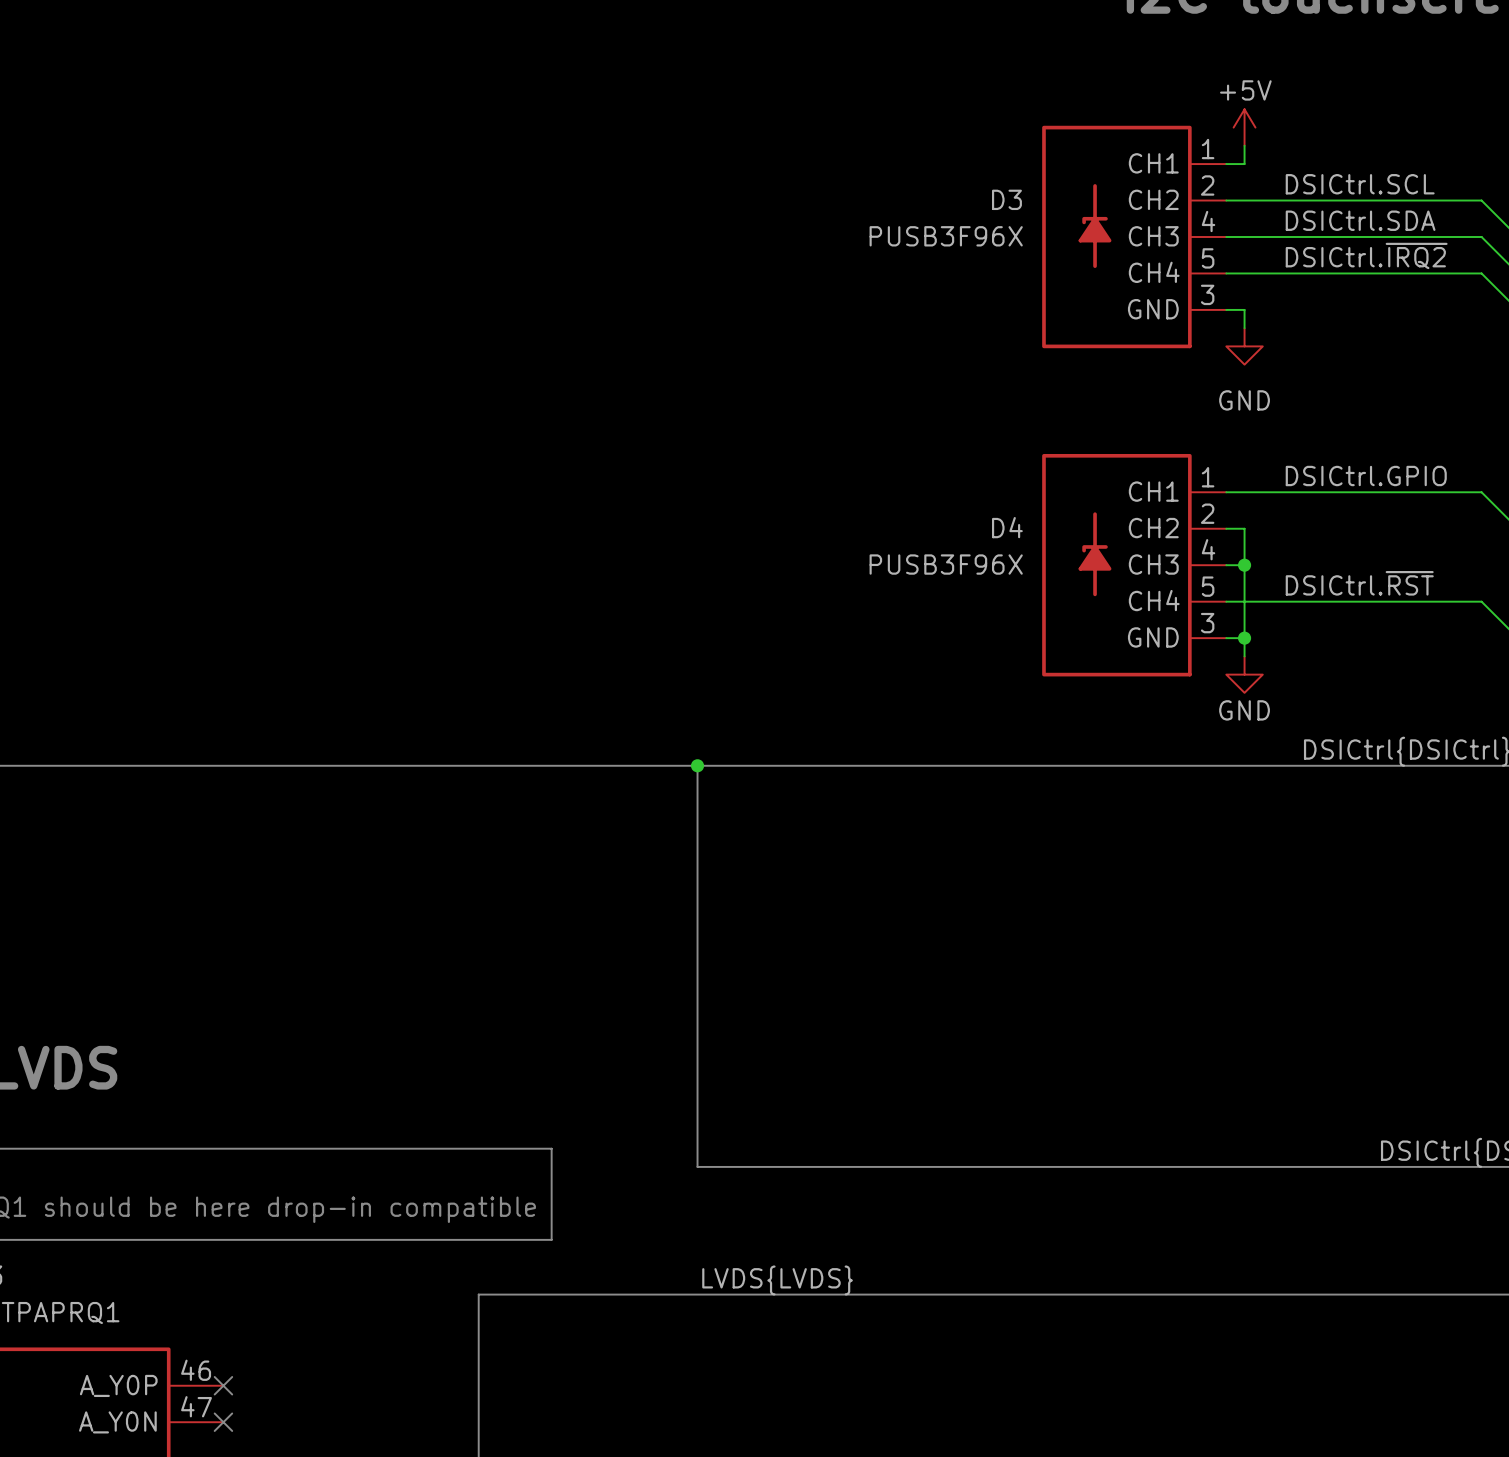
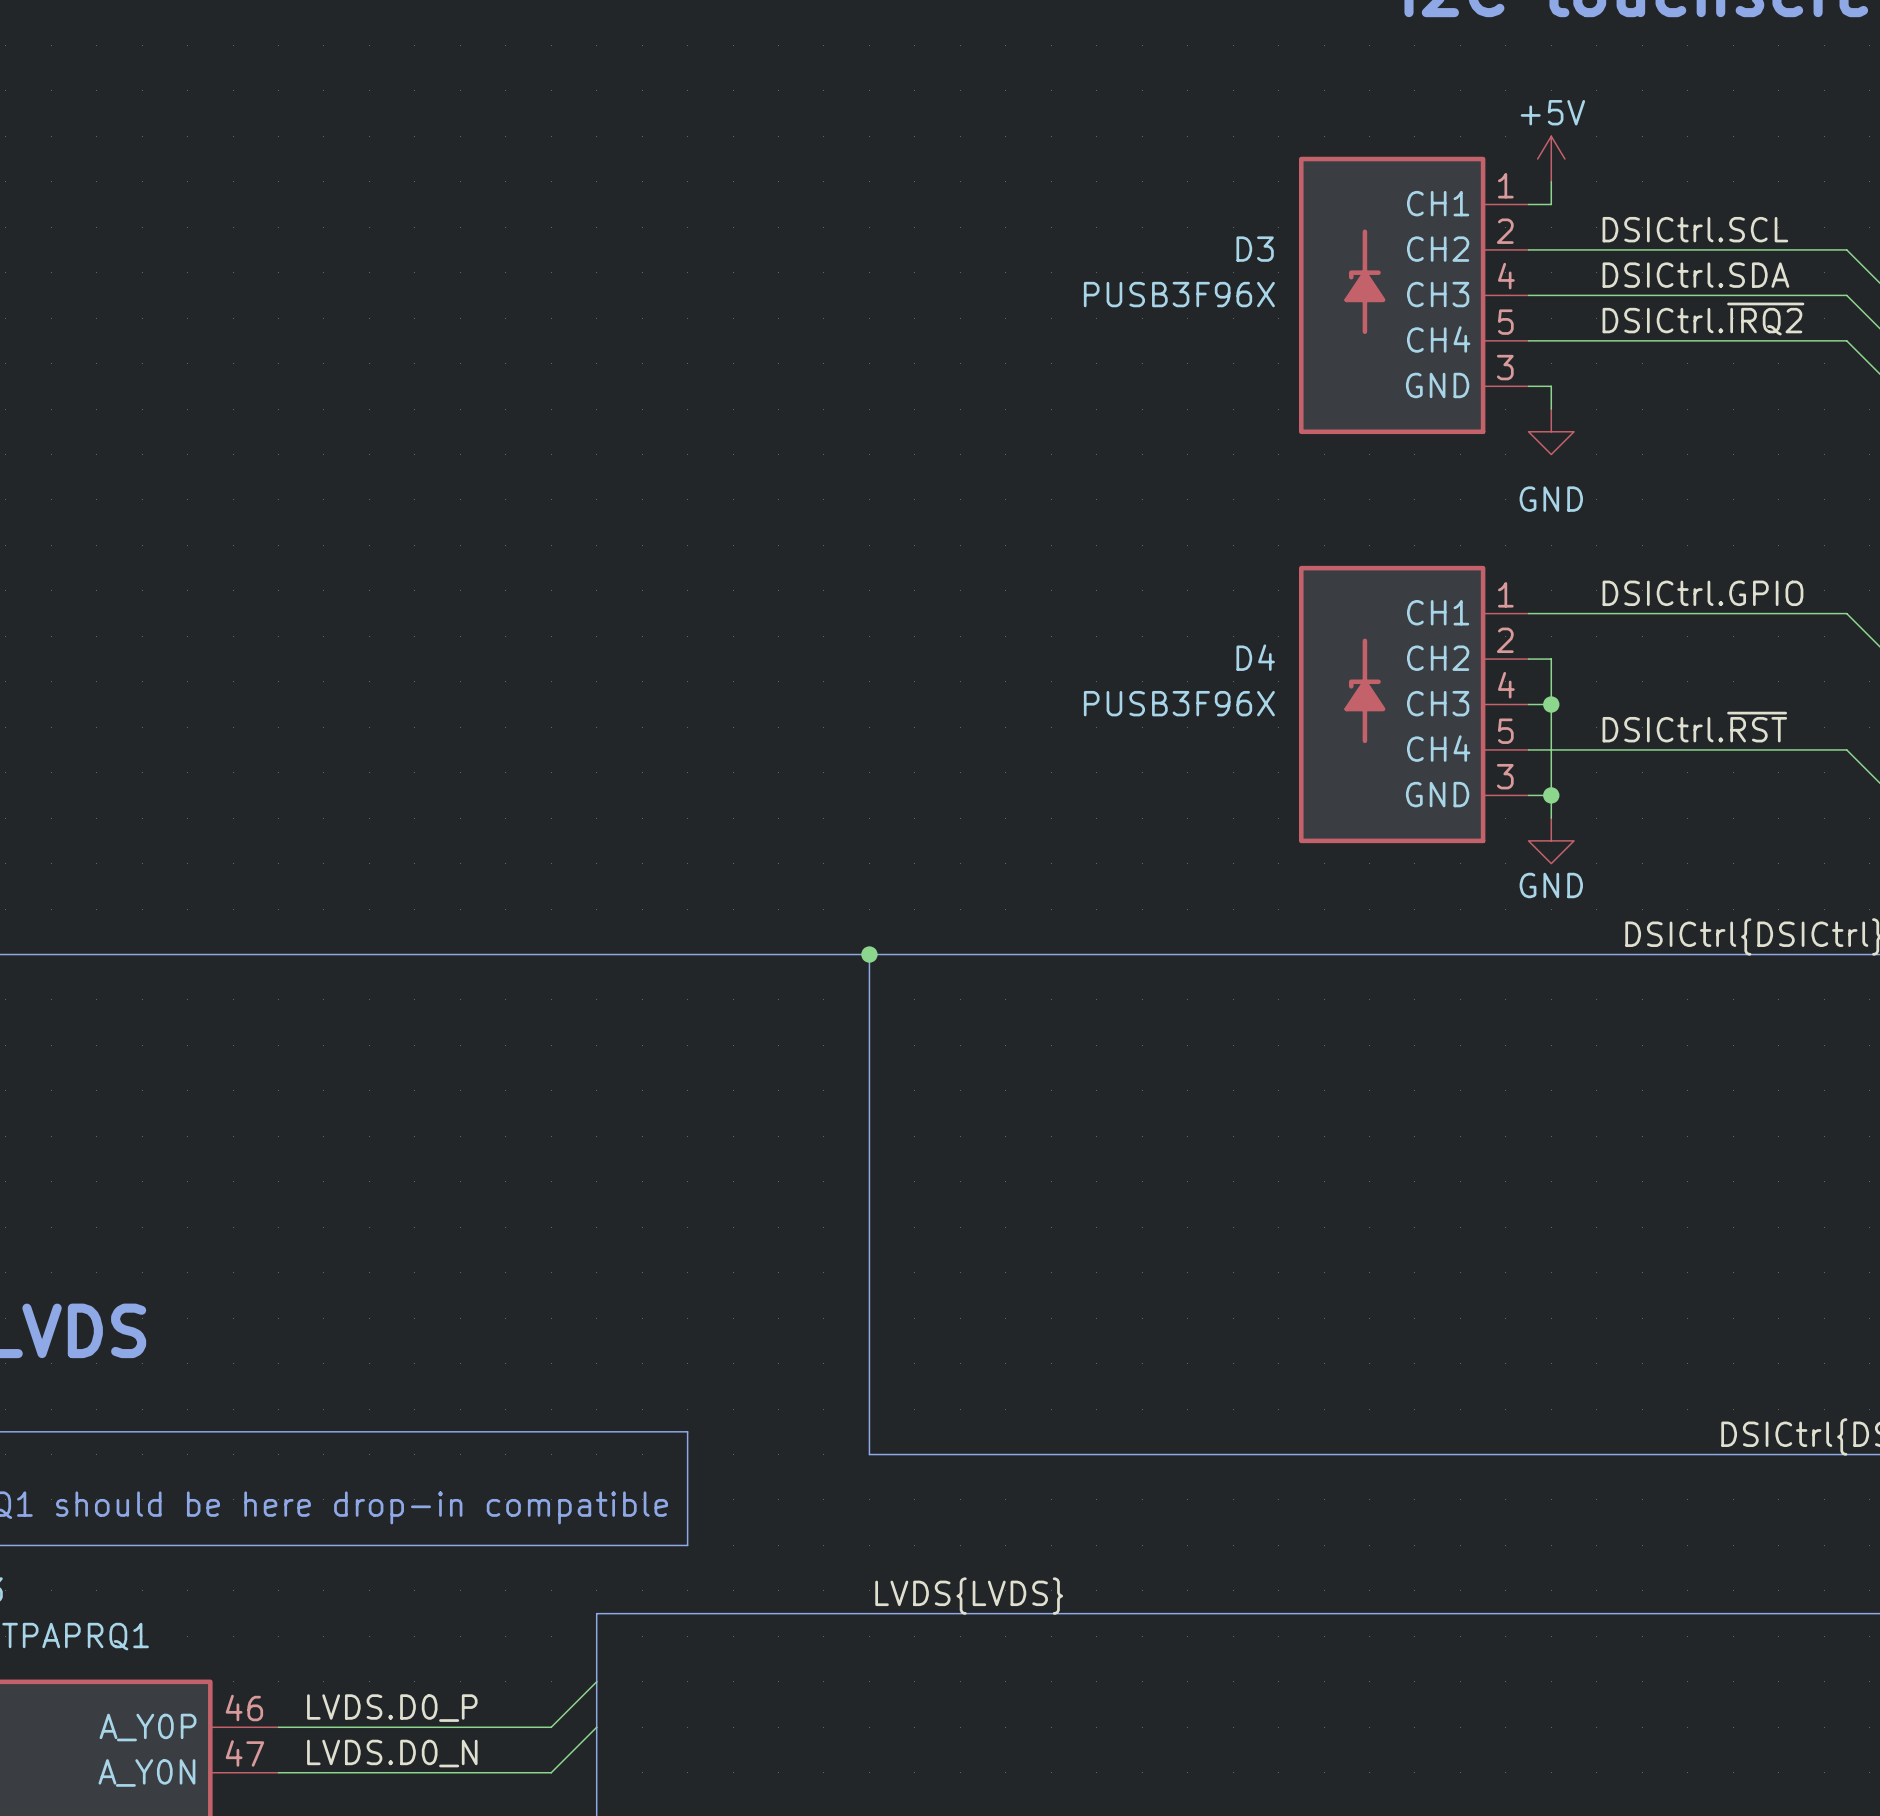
wire: none -> (596, 1681) (551, 1727) (278, 1727)
label: none -> LVDS.D0_P (392, 1708)
no-connect mark: (223, 1385) -> none
wire: none -> (596, 1727) (551, 1772) (278, 1772)
label: none -> LVDS.D0_N (392, 1753)
no-connect mark: (223, 1422) -> none

